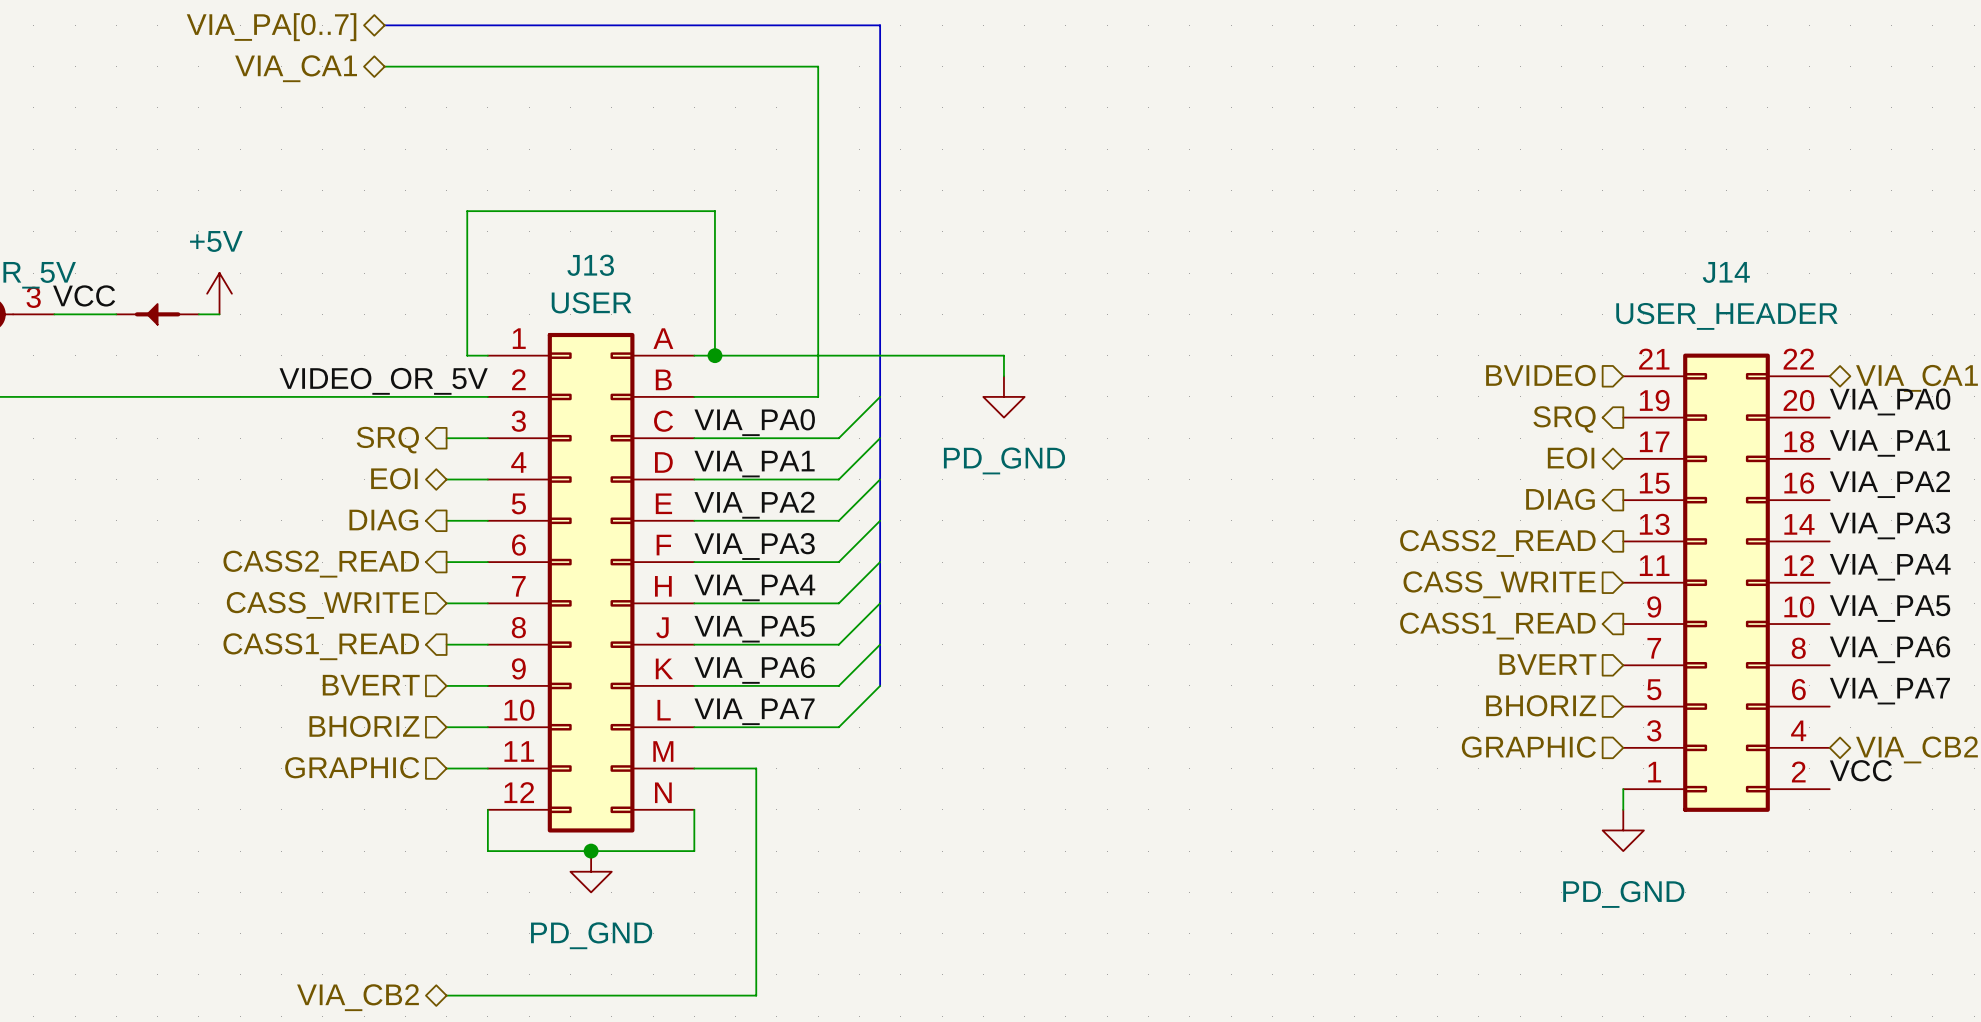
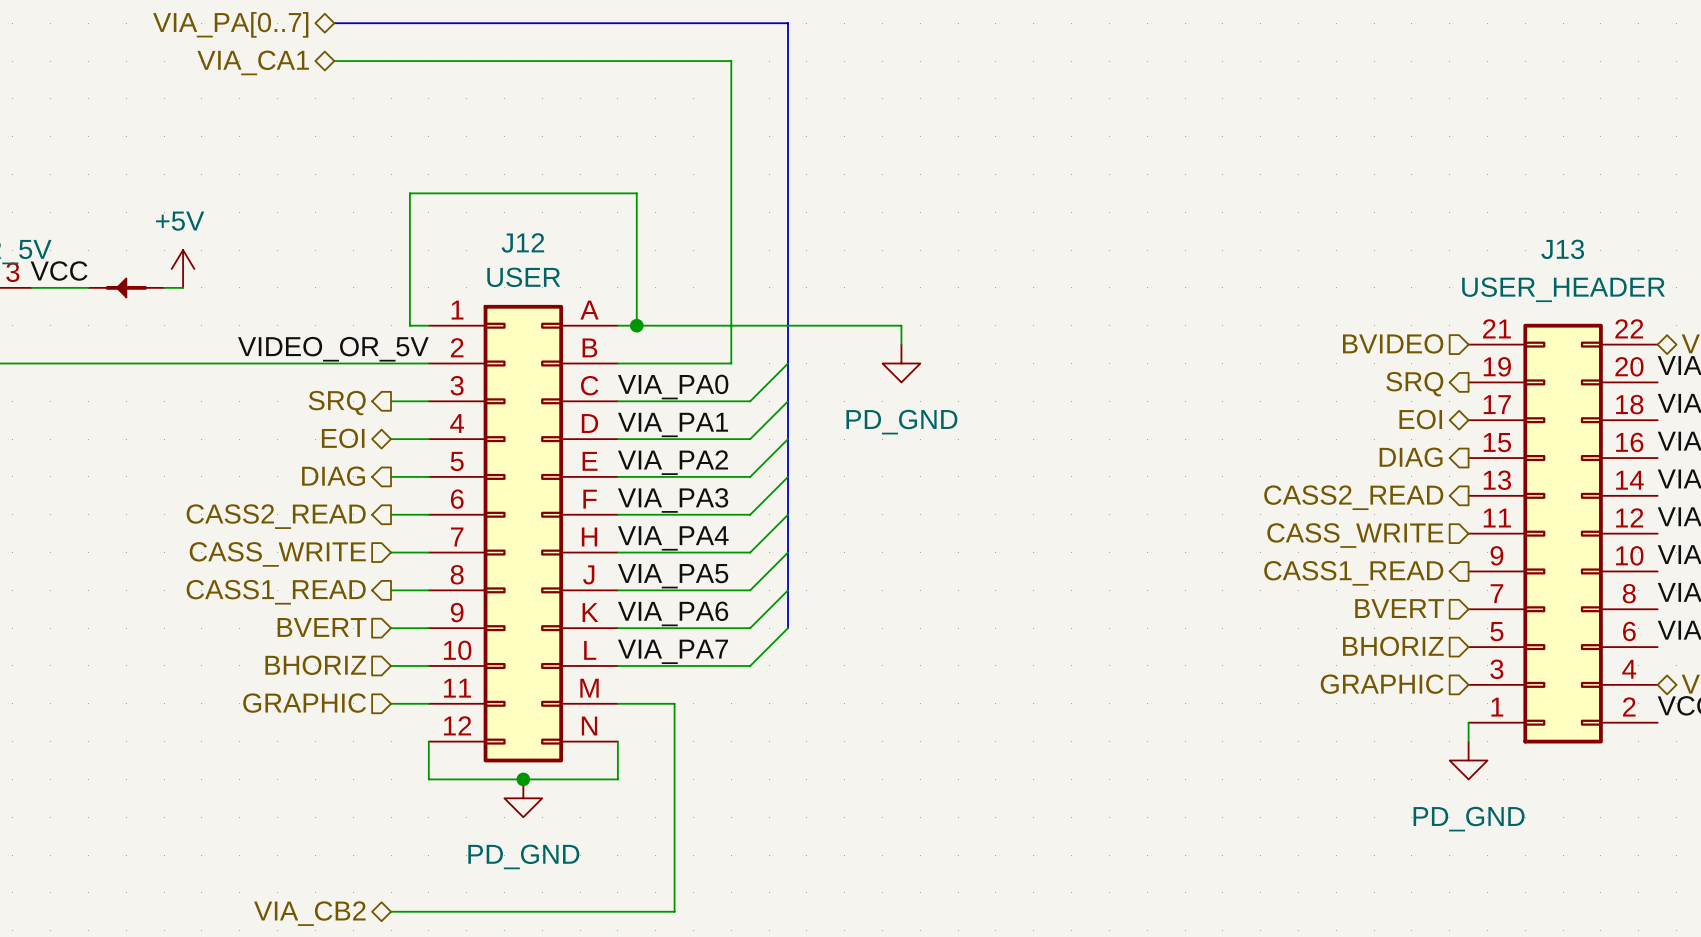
J13 name: J13 (590, 265) -> J12 (522, 242)
J14 name: J14 (1726, 272) -> J13 (1562, 249)

